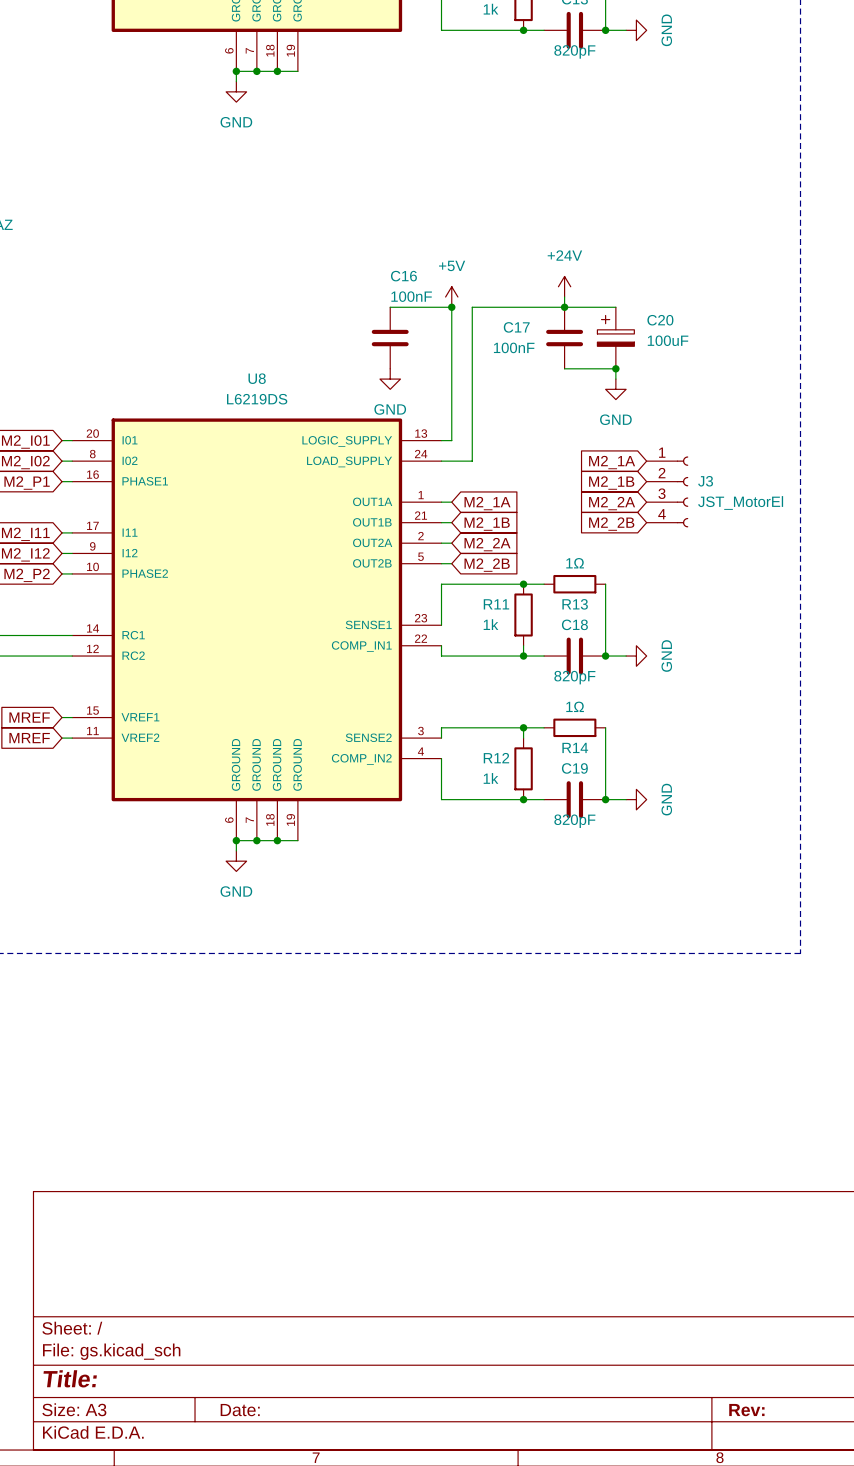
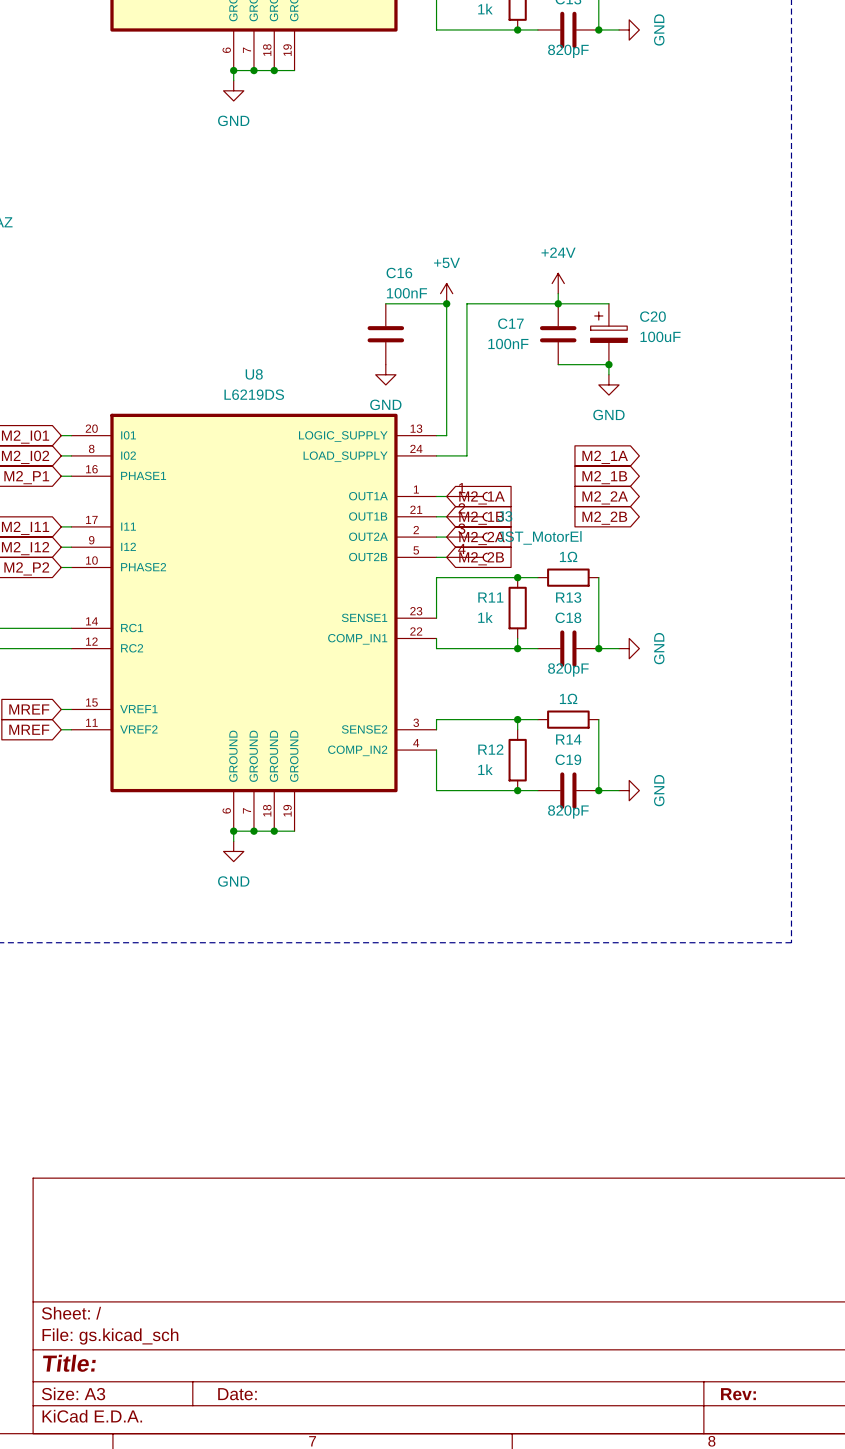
J3 position: (667, 491) -> (467, 526)

